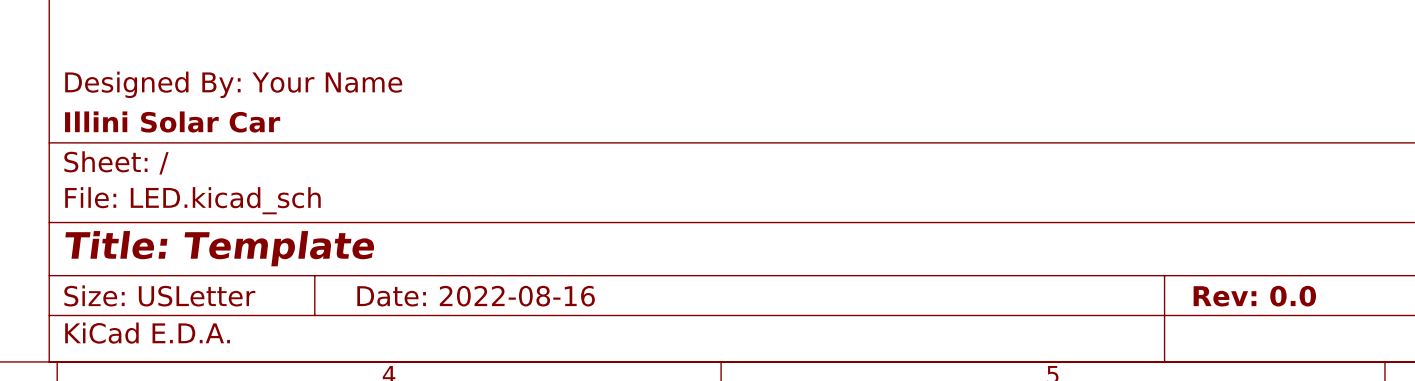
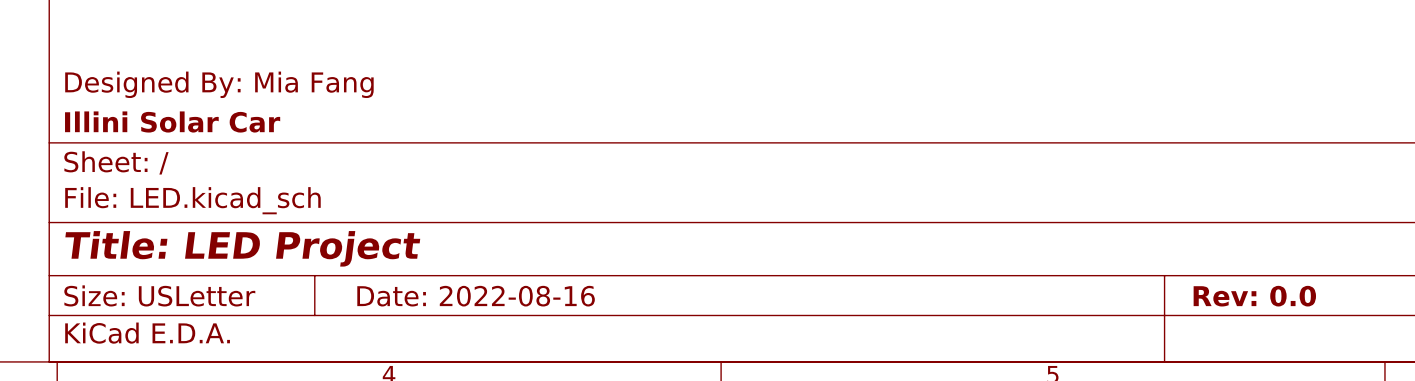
title block: Designed By: Your Name (233, 84) -> Designed By: Mia Fang (219, 84)
title block: Title: Template (219, 248) -> Title: LED Project (242, 248)

